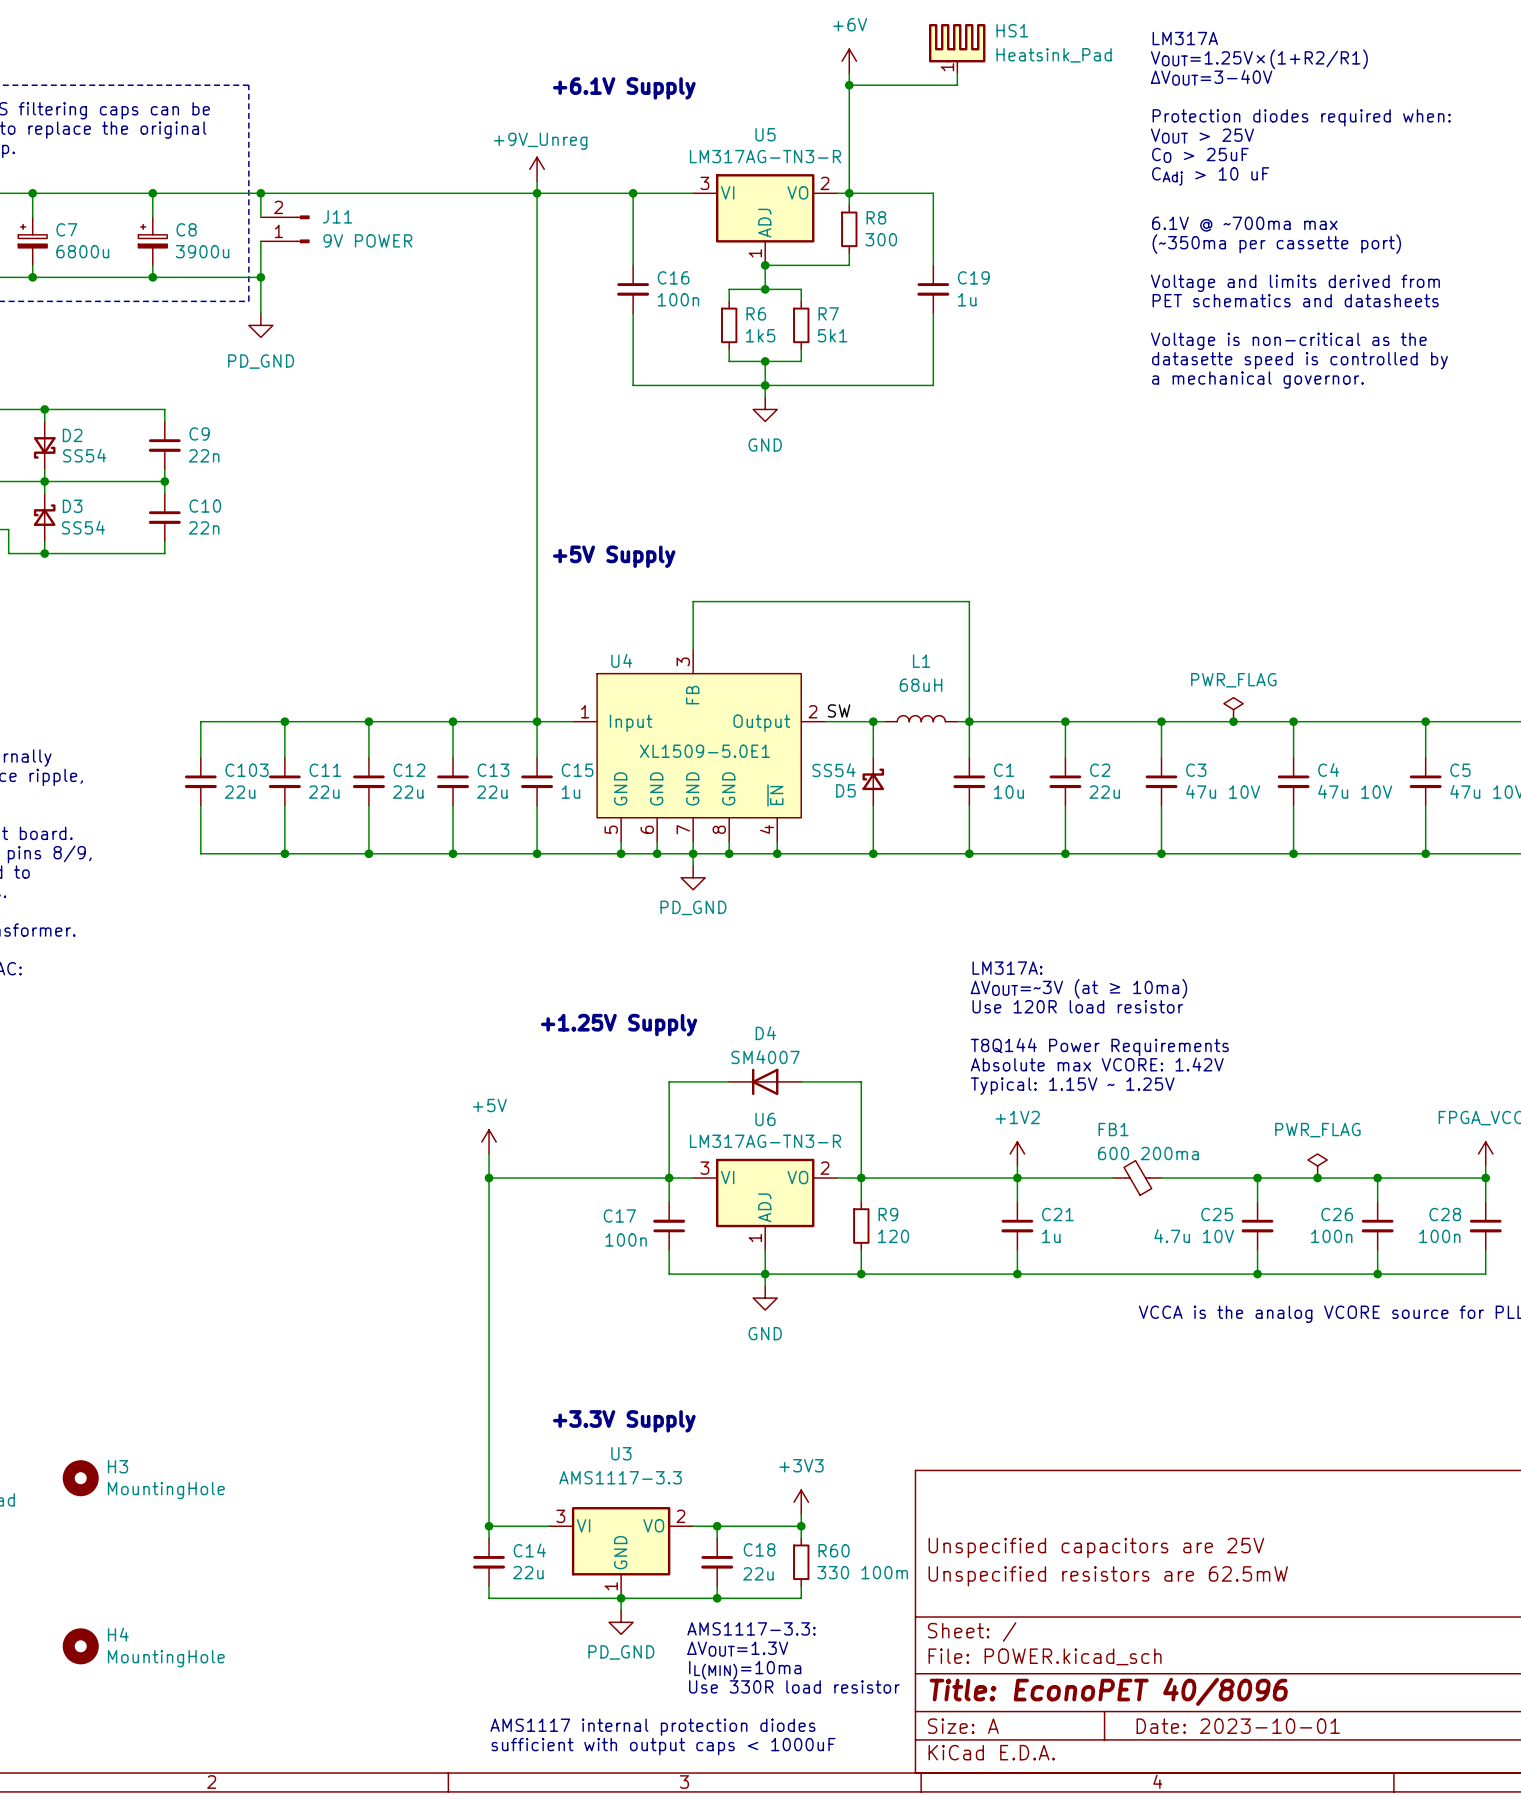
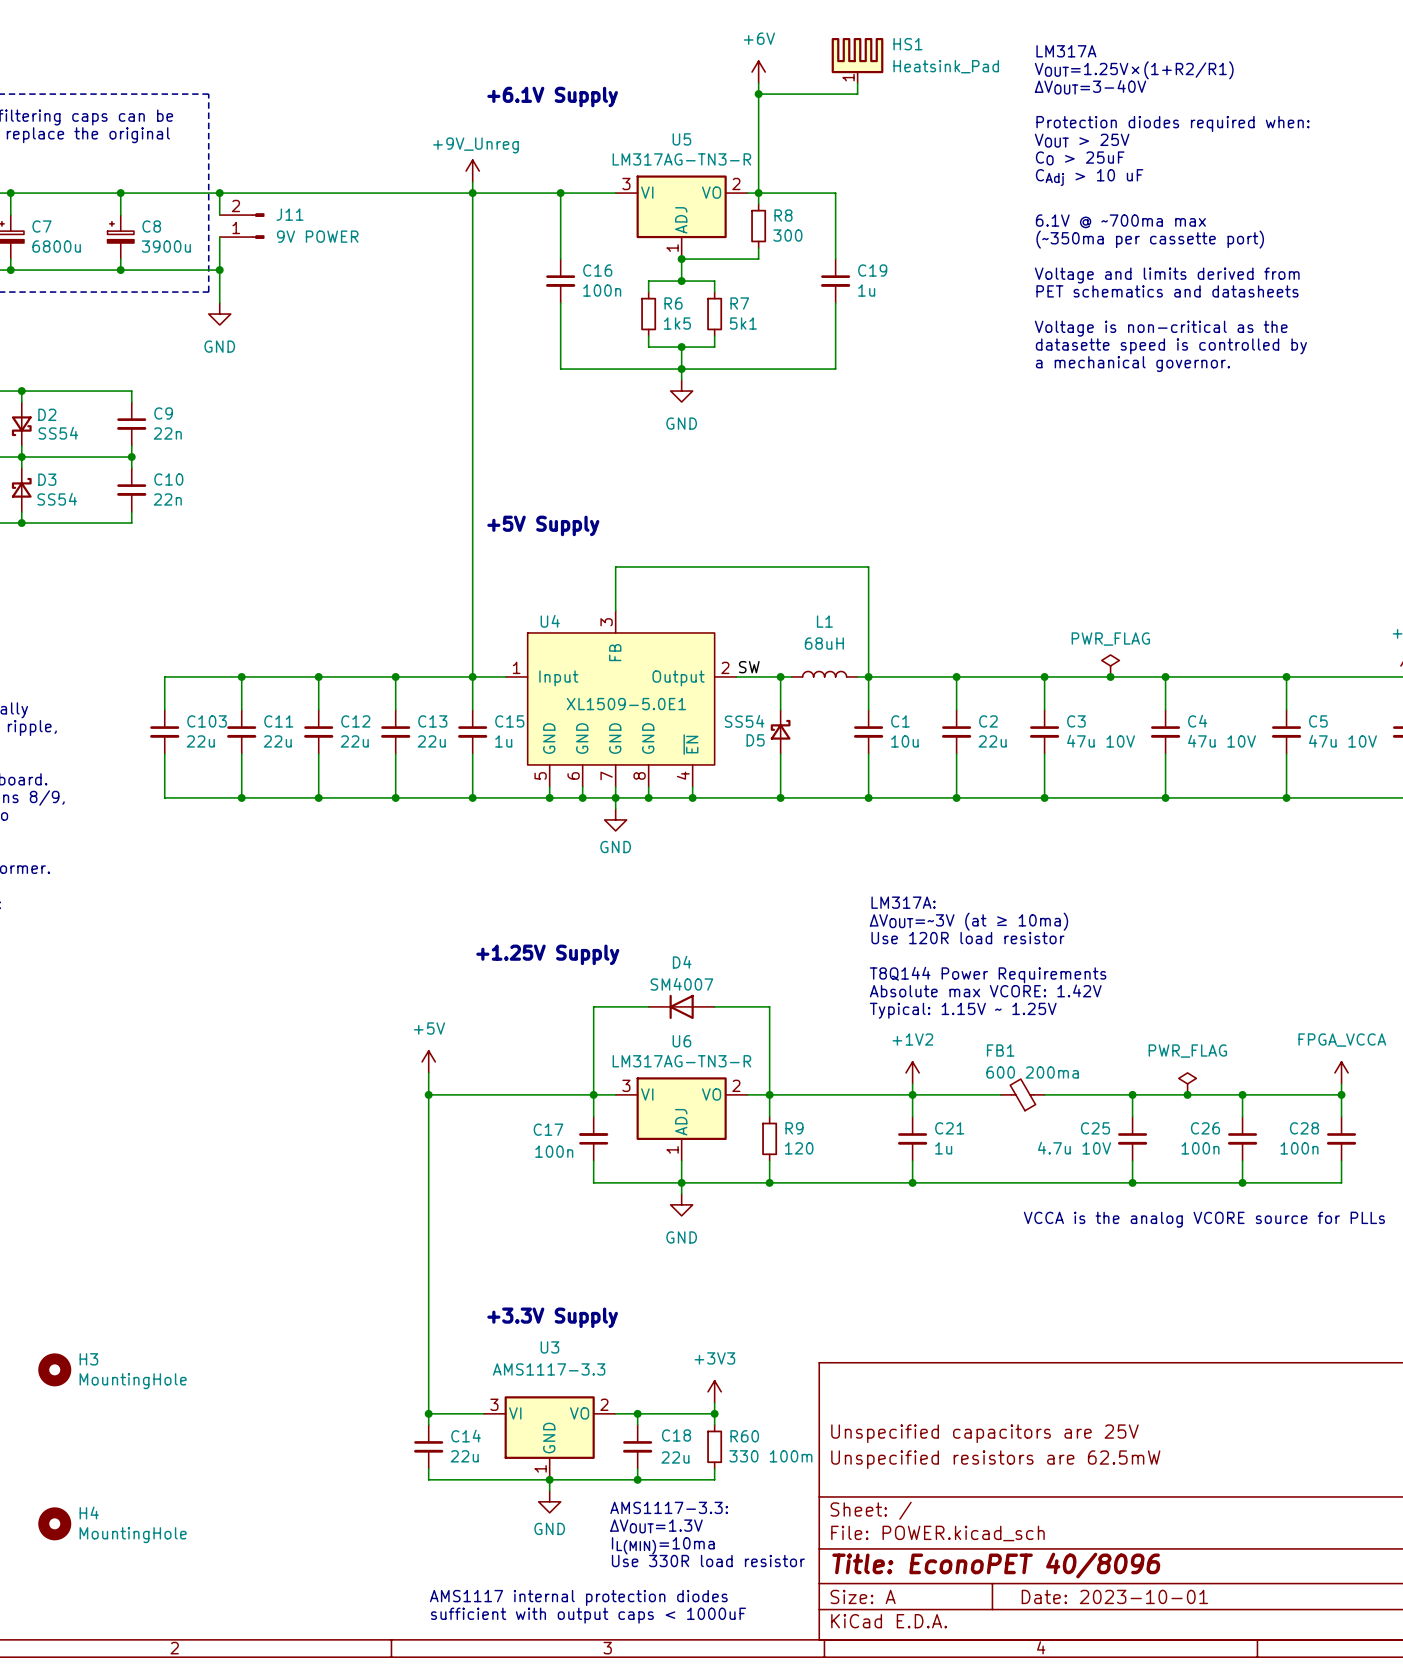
power symbol: PD_GND (260, 325) -> GND (219, 314)
power symbol: PD_GND (693, 877) -> GND (615, 819)
power symbol: PD_GND (621, 1622) -> GND (549, 1501)

